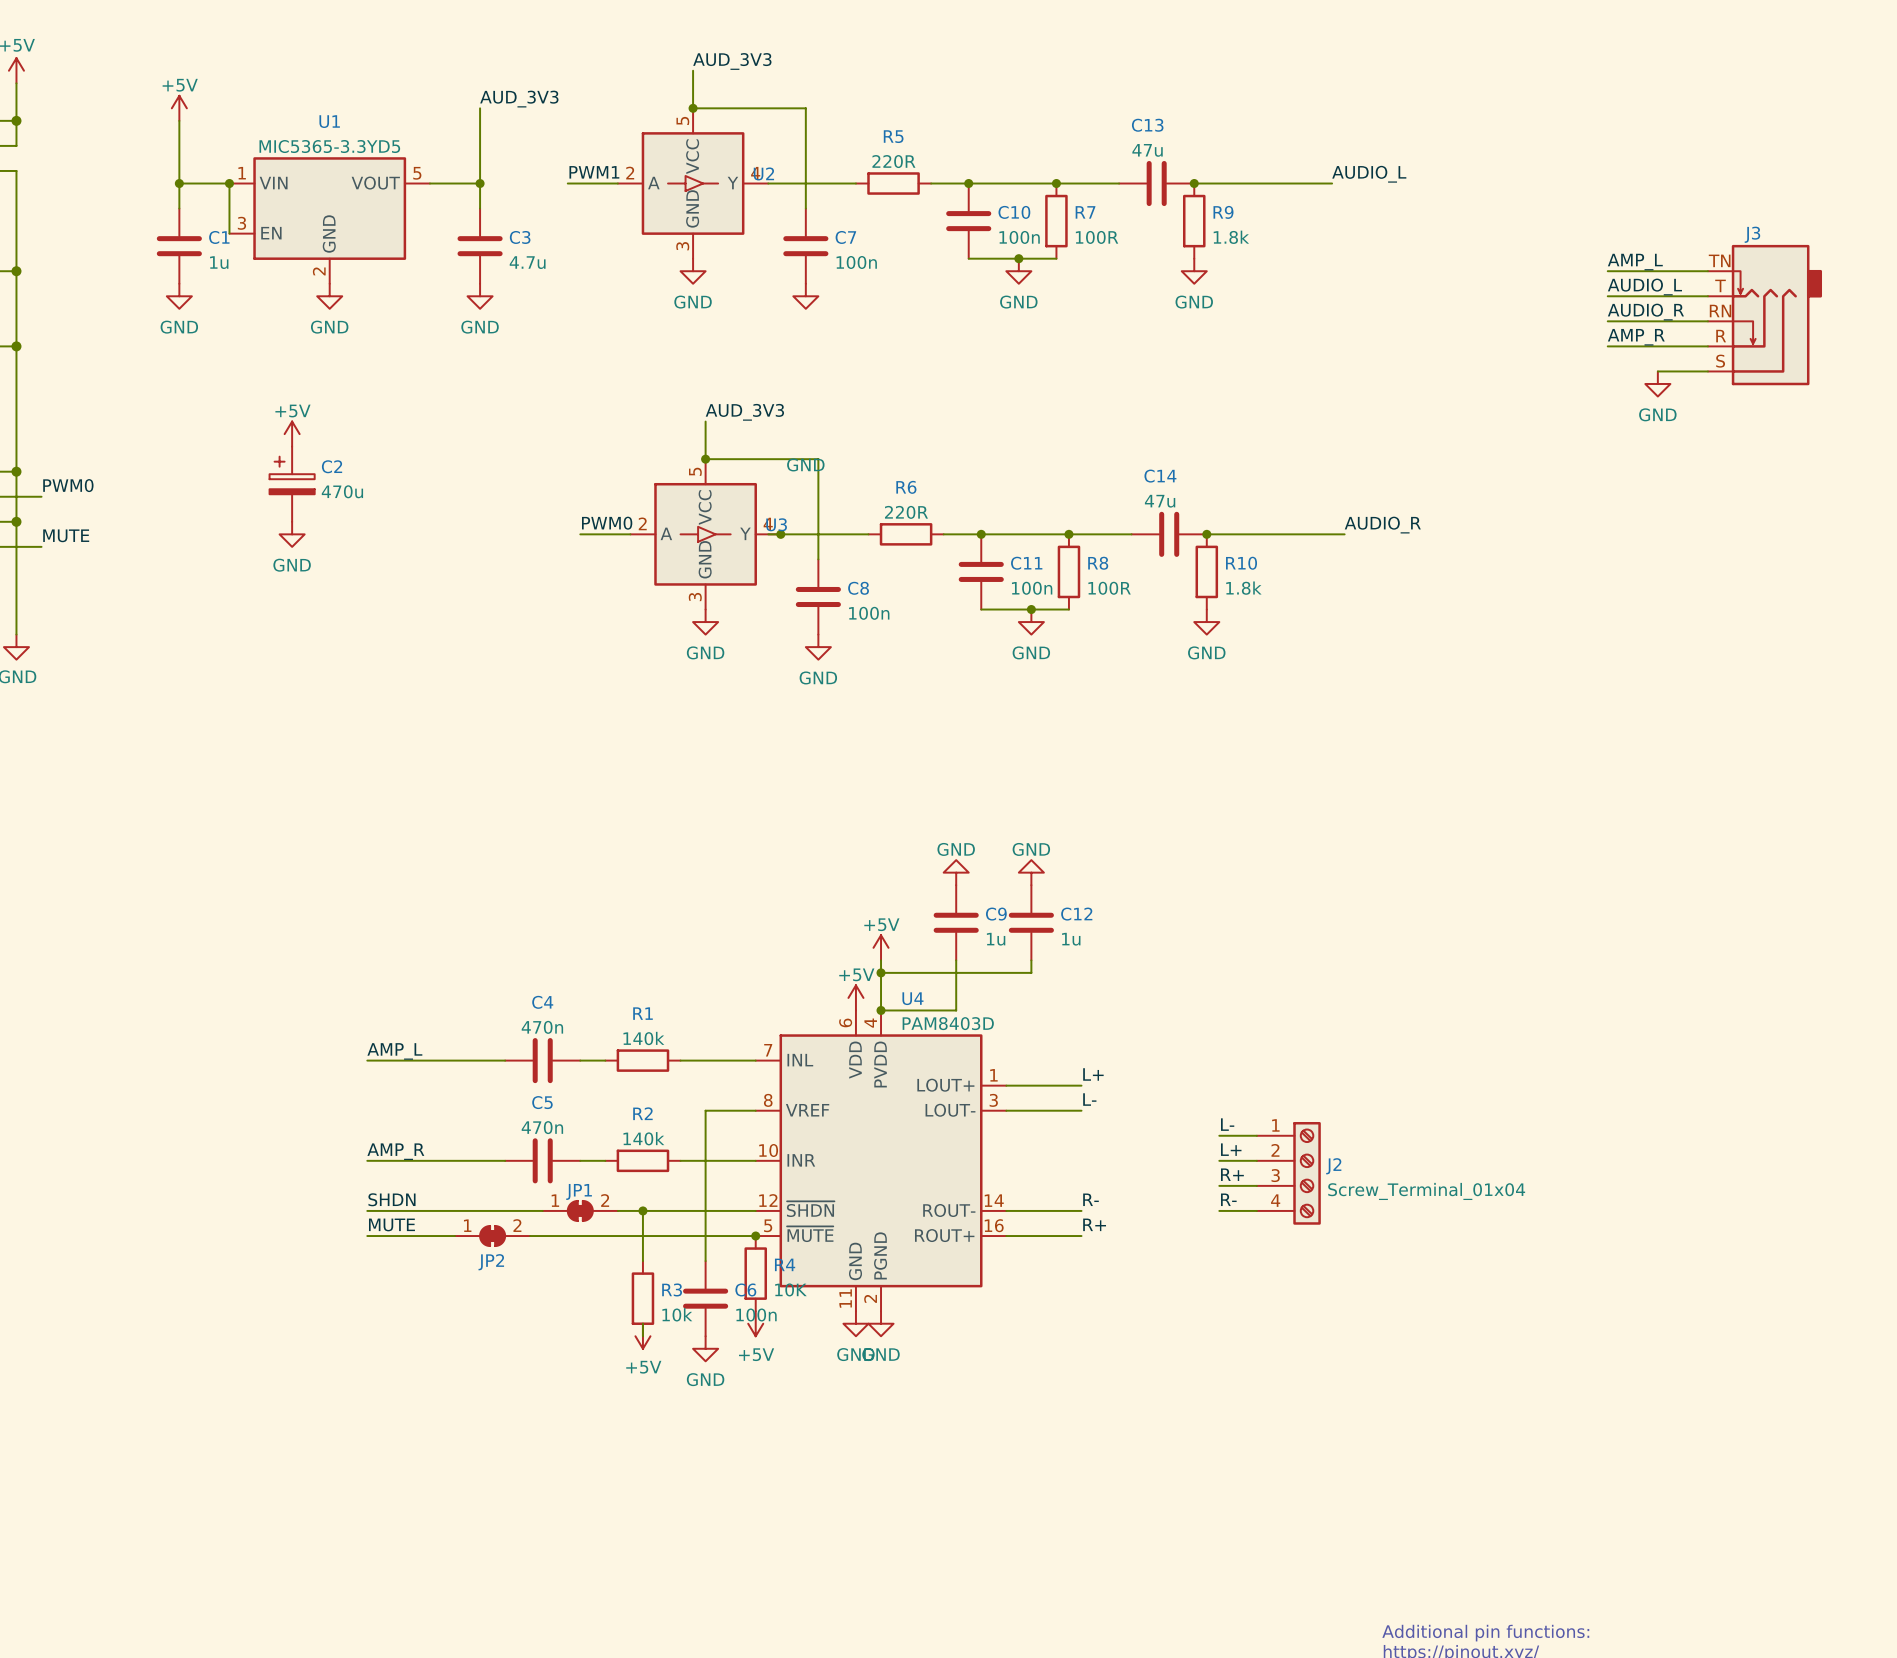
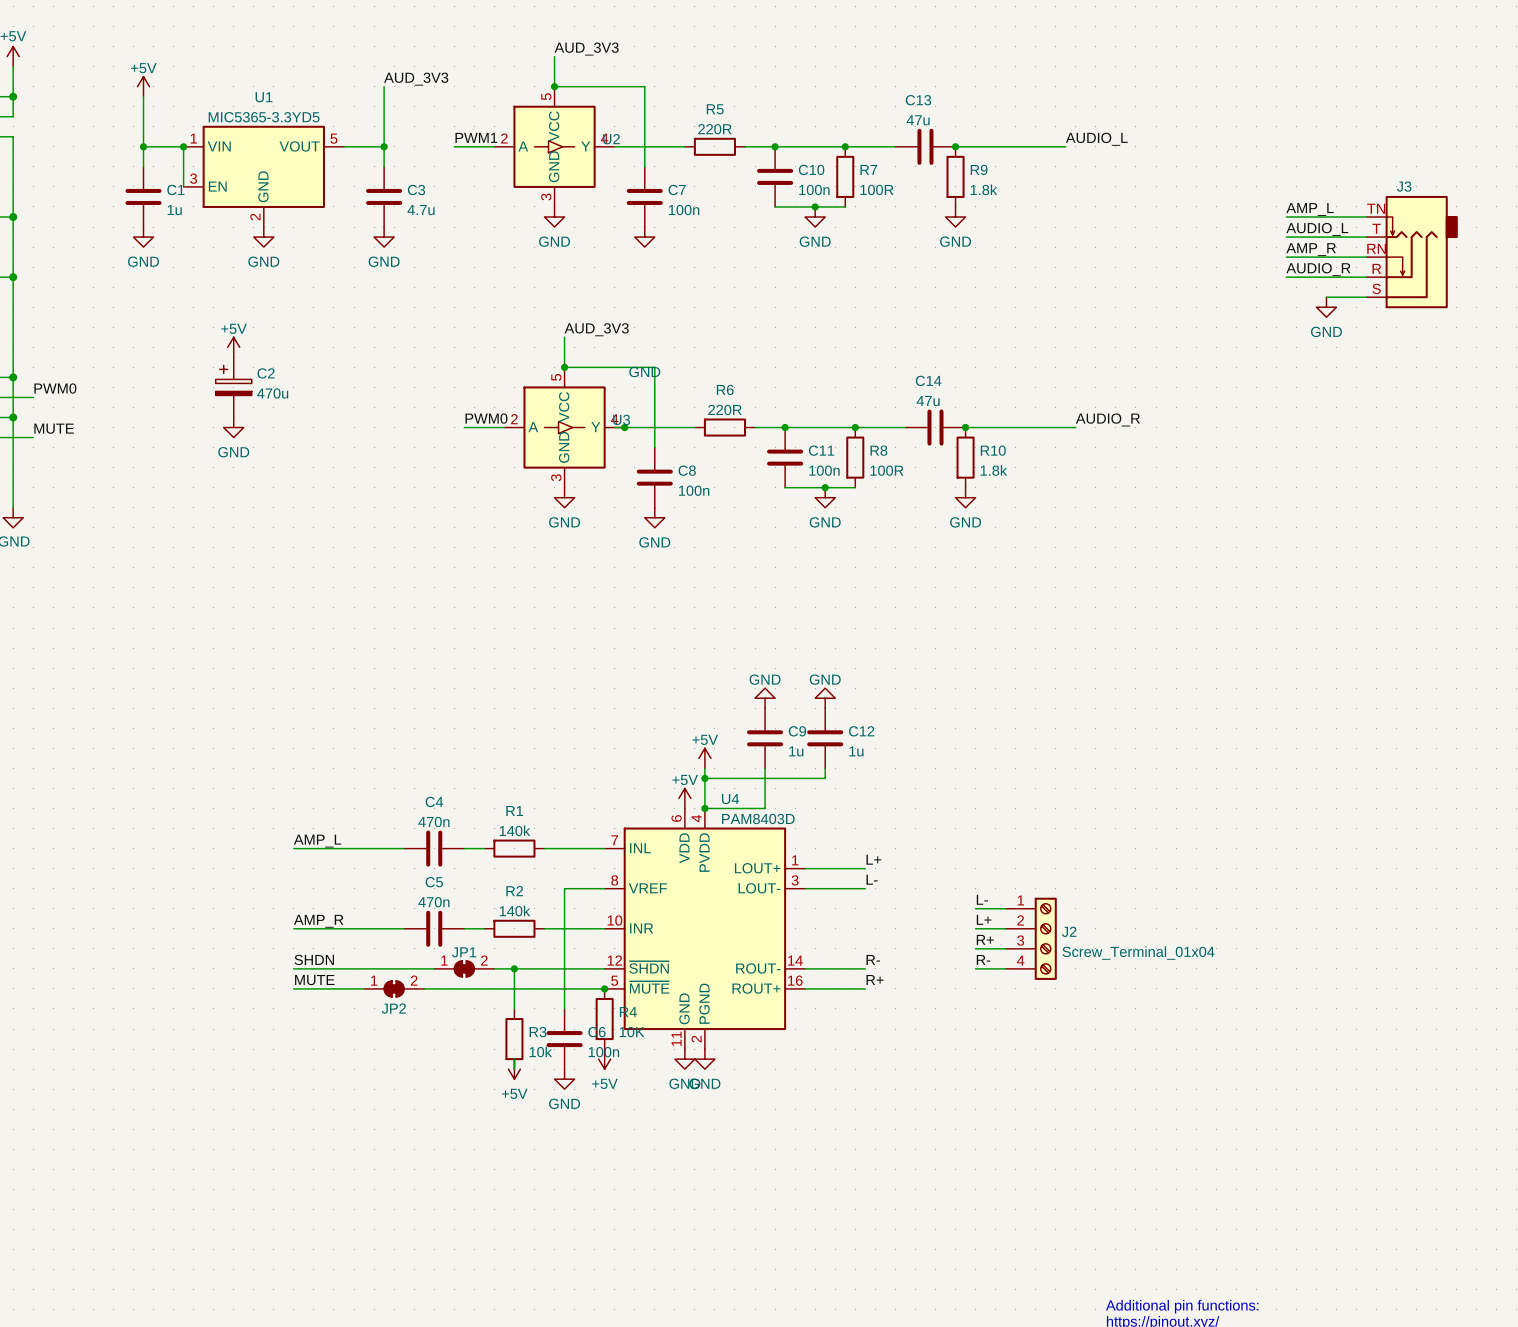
label: AUDIO_R (1645, 312) -> AMP_R (1311, 249)
label: AMP_R (1636, 337) -> AUDIO_R (1318, 269)

